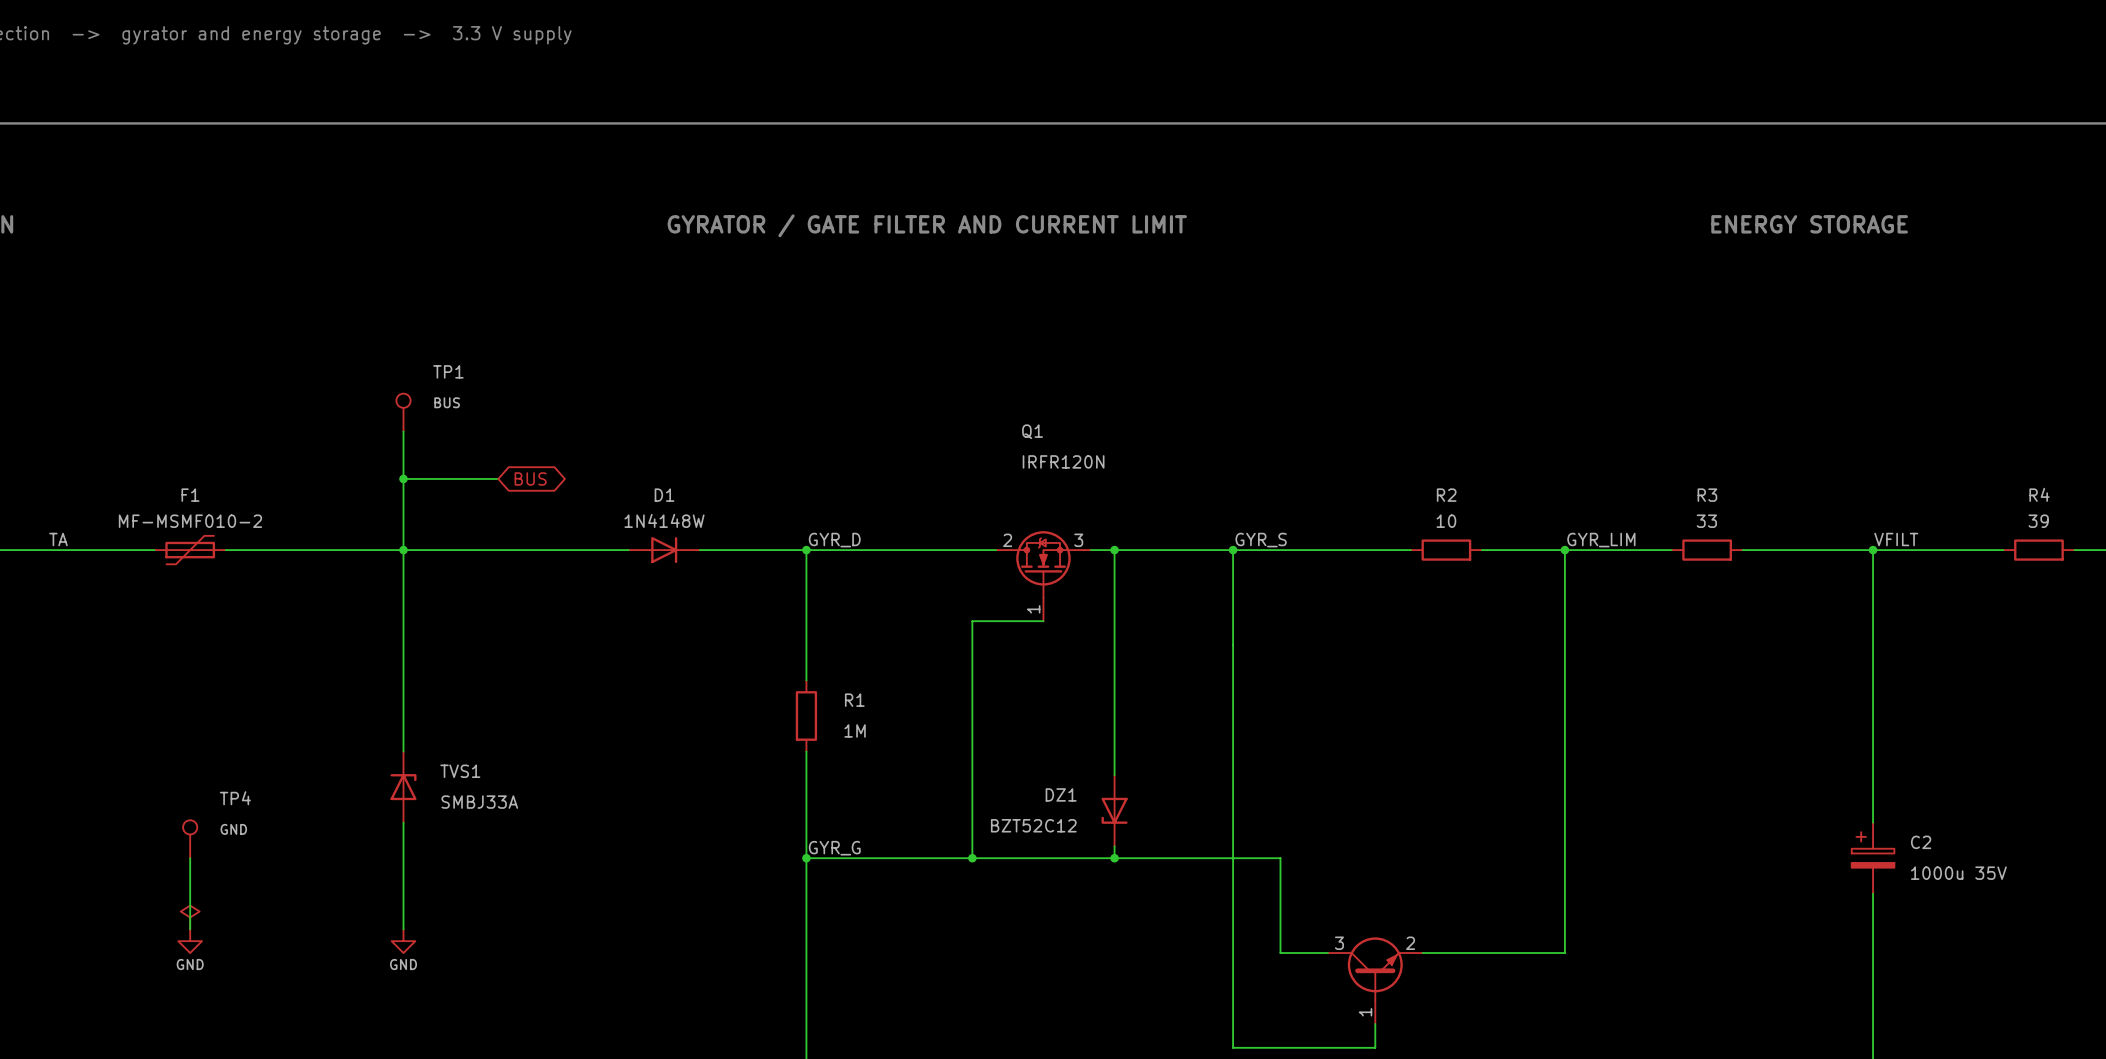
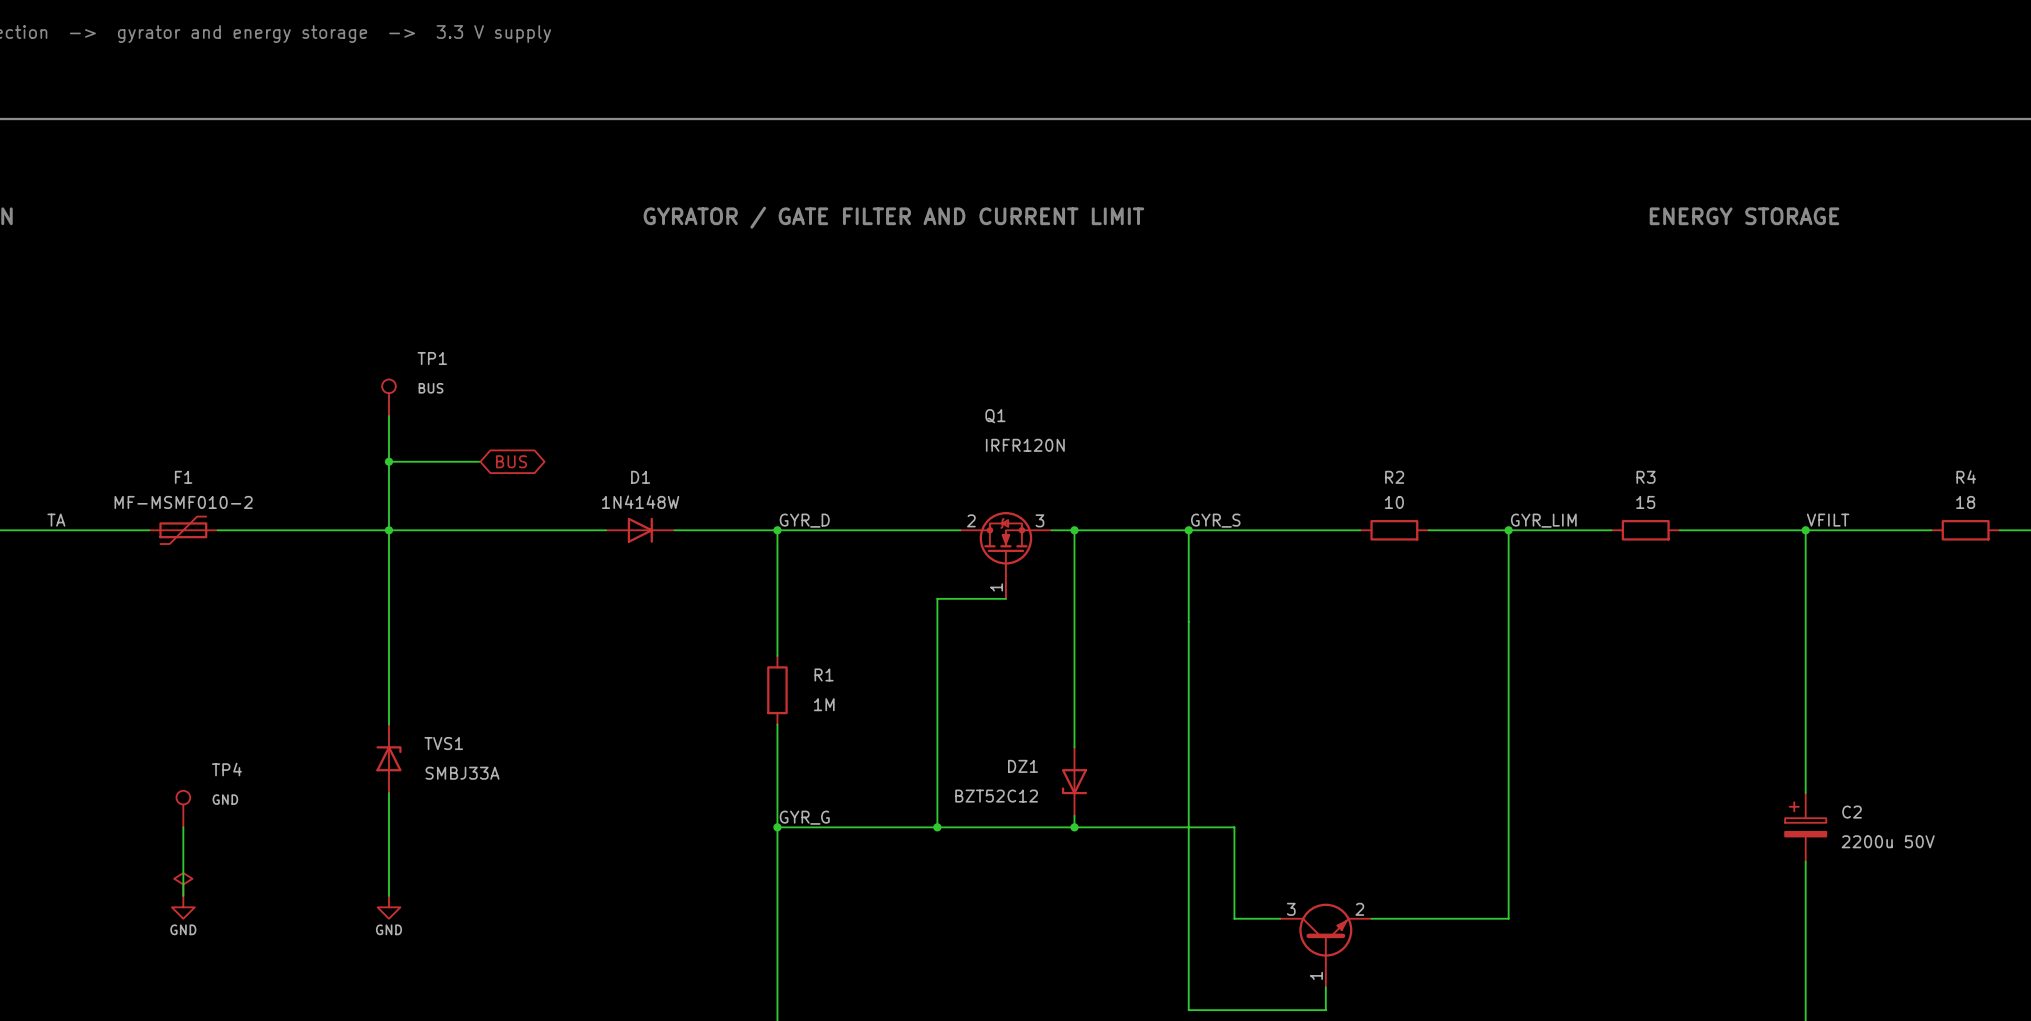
R3 value: 33 (1706, 521) -> 15 (1645, 502)
R4 value: 39 (2038, 521) -> 18 (1965, 502)
C2 value: 1000u 35V (1958, 873) -> 2200u 50V (1888, 841)

